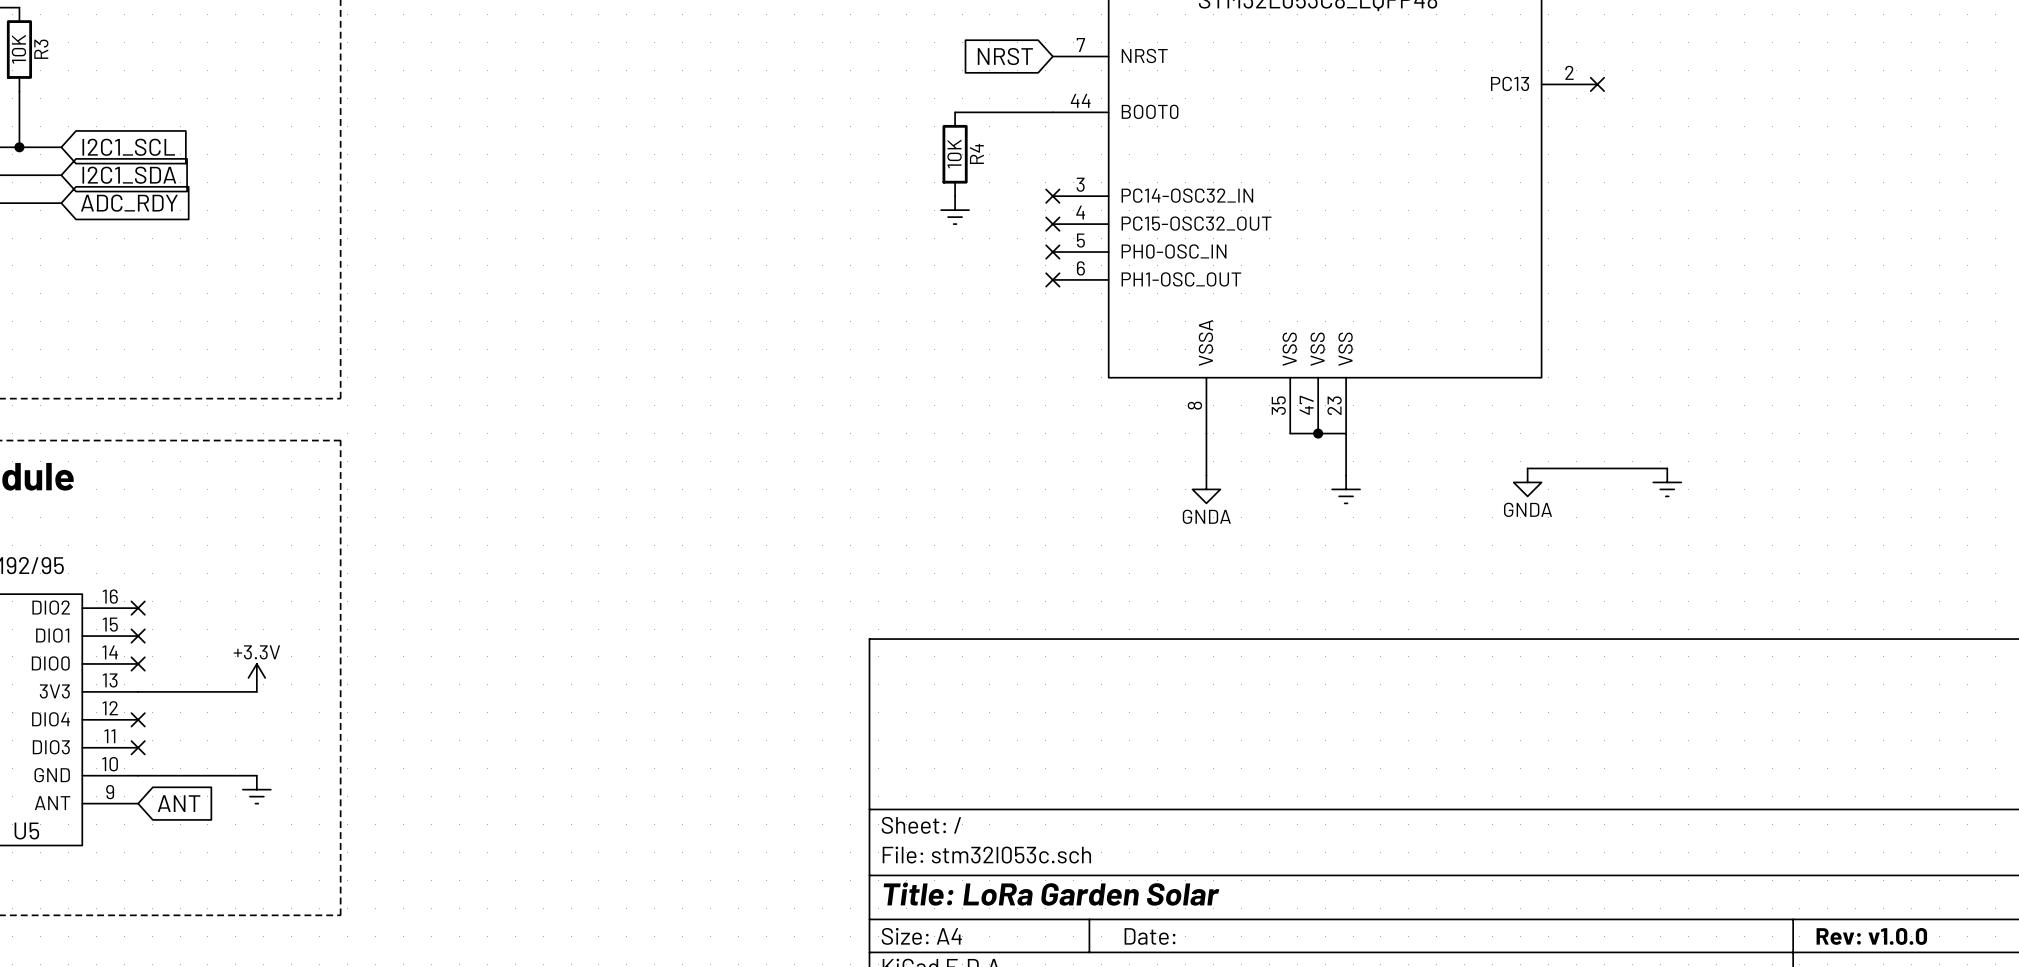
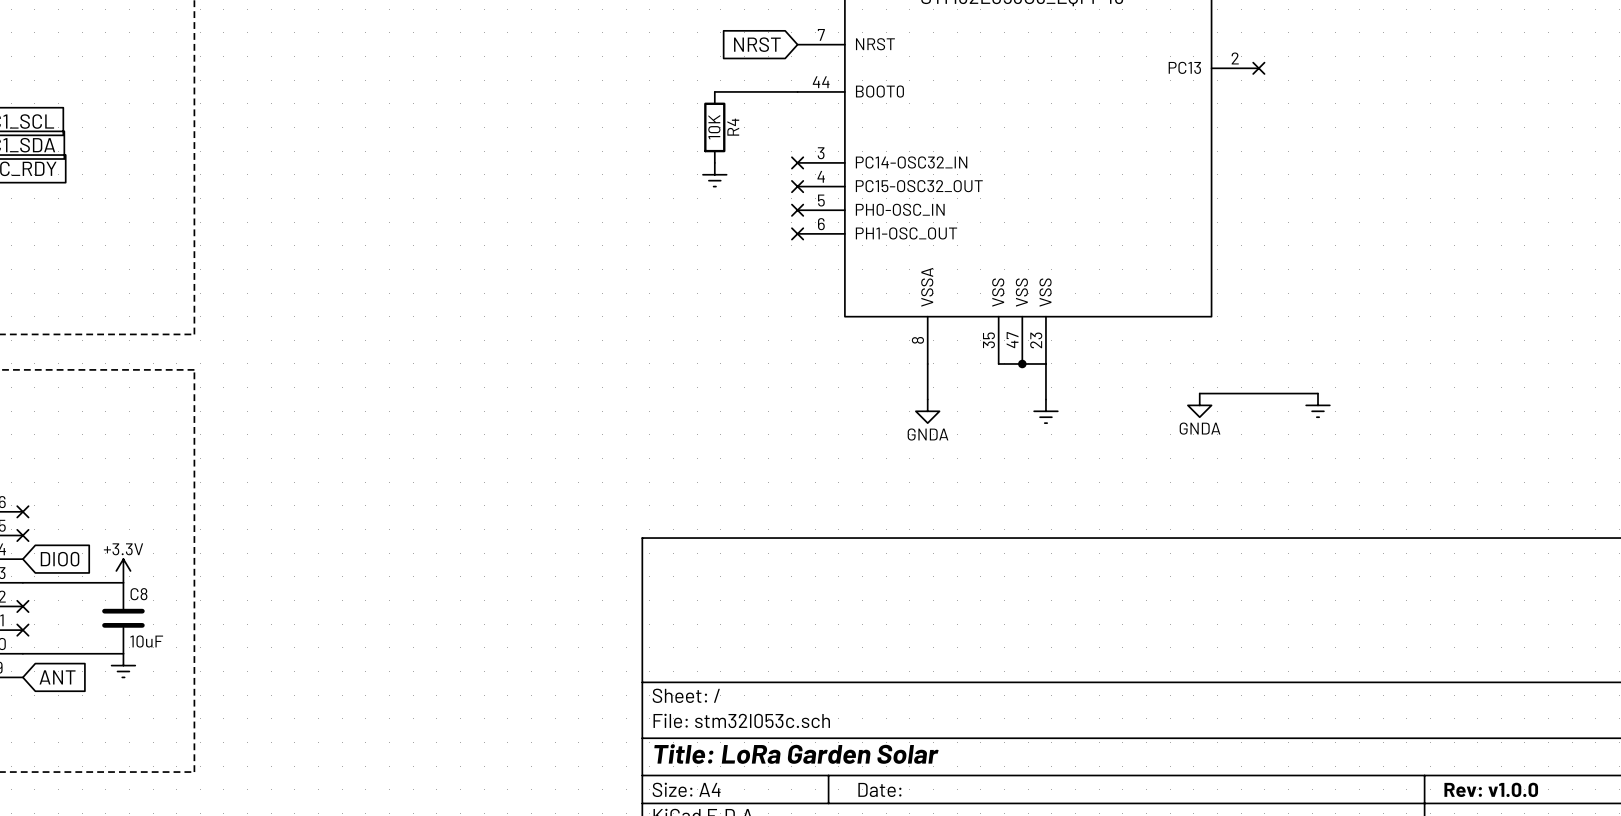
no-connect mark: (138, 663) -> none
global label: none -> DIO0 (60, 559)
C8: none -> 10uF (123, 618)

